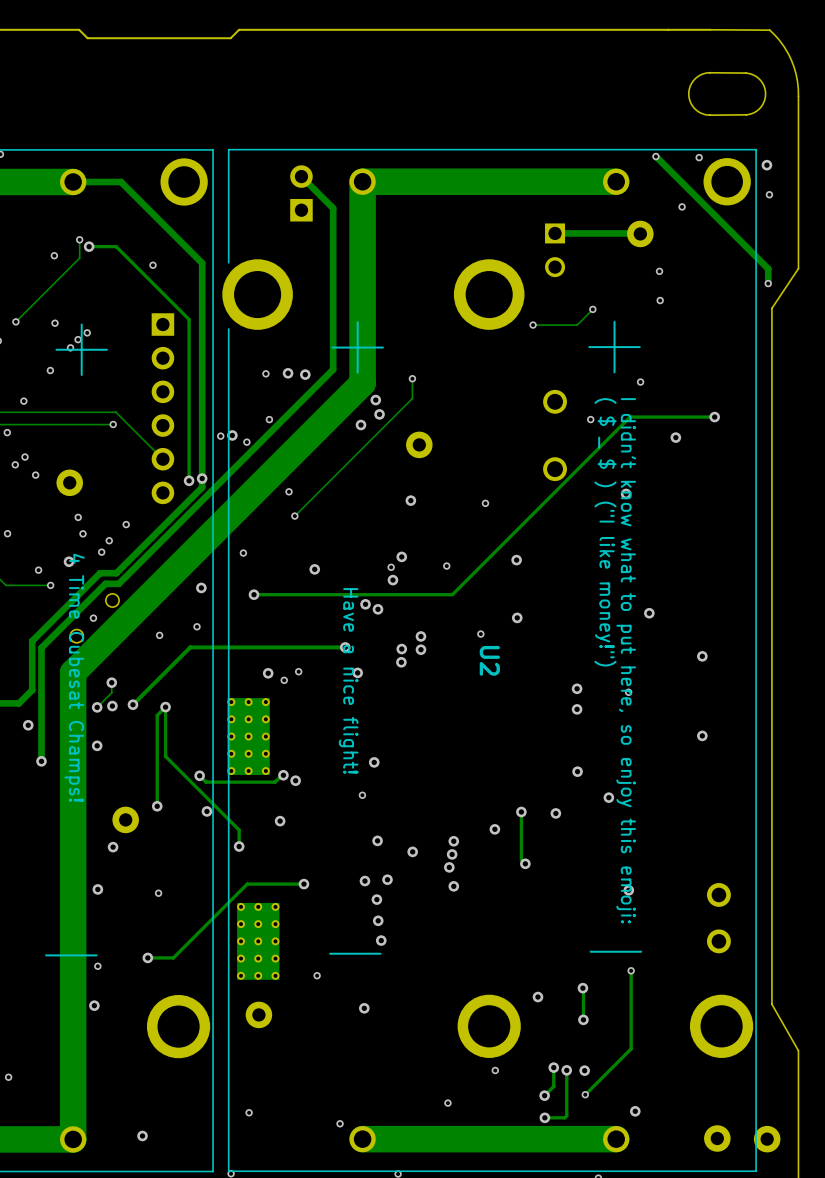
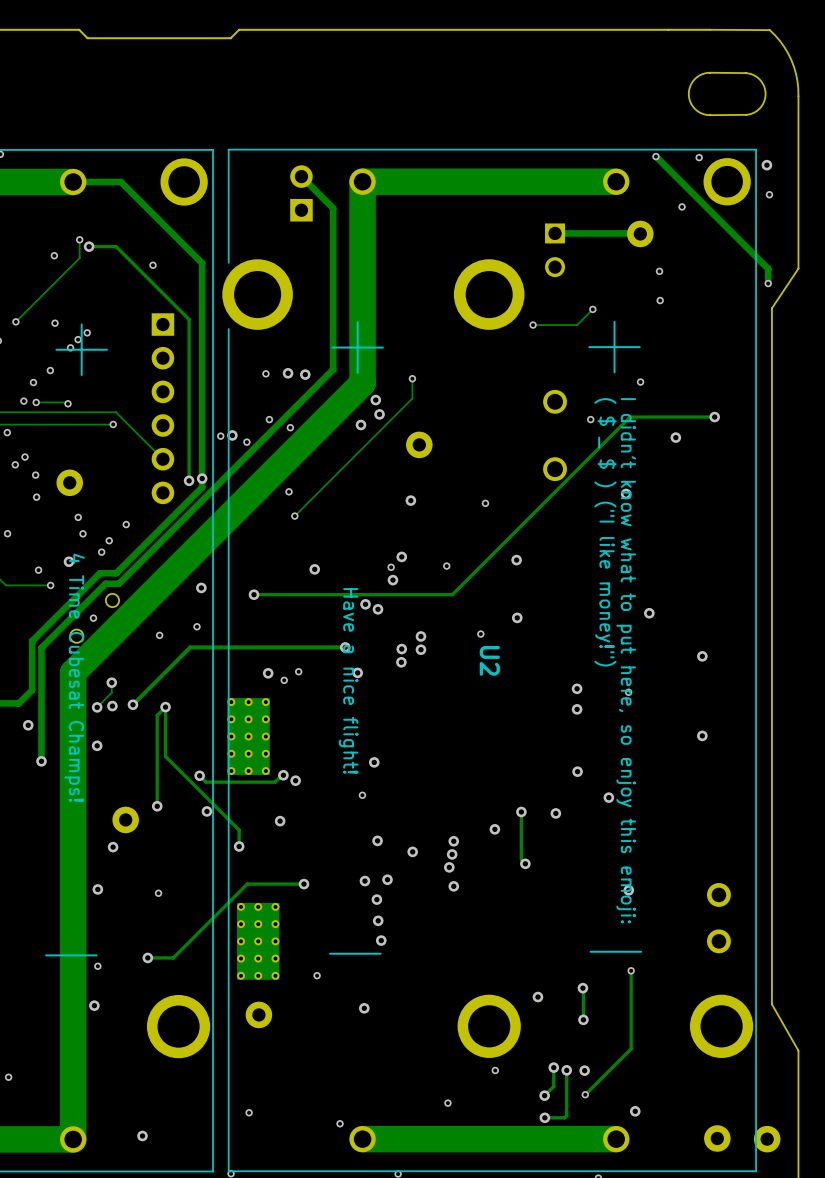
via: none -> (33, 382)
track: none -> (36, 402) (68, 403)
via: none -> (36, 402)
via: none -> (68, 403)
via: none -> (290, 427)
via: none -> (36, 497)
via: (243, 553) -> none

